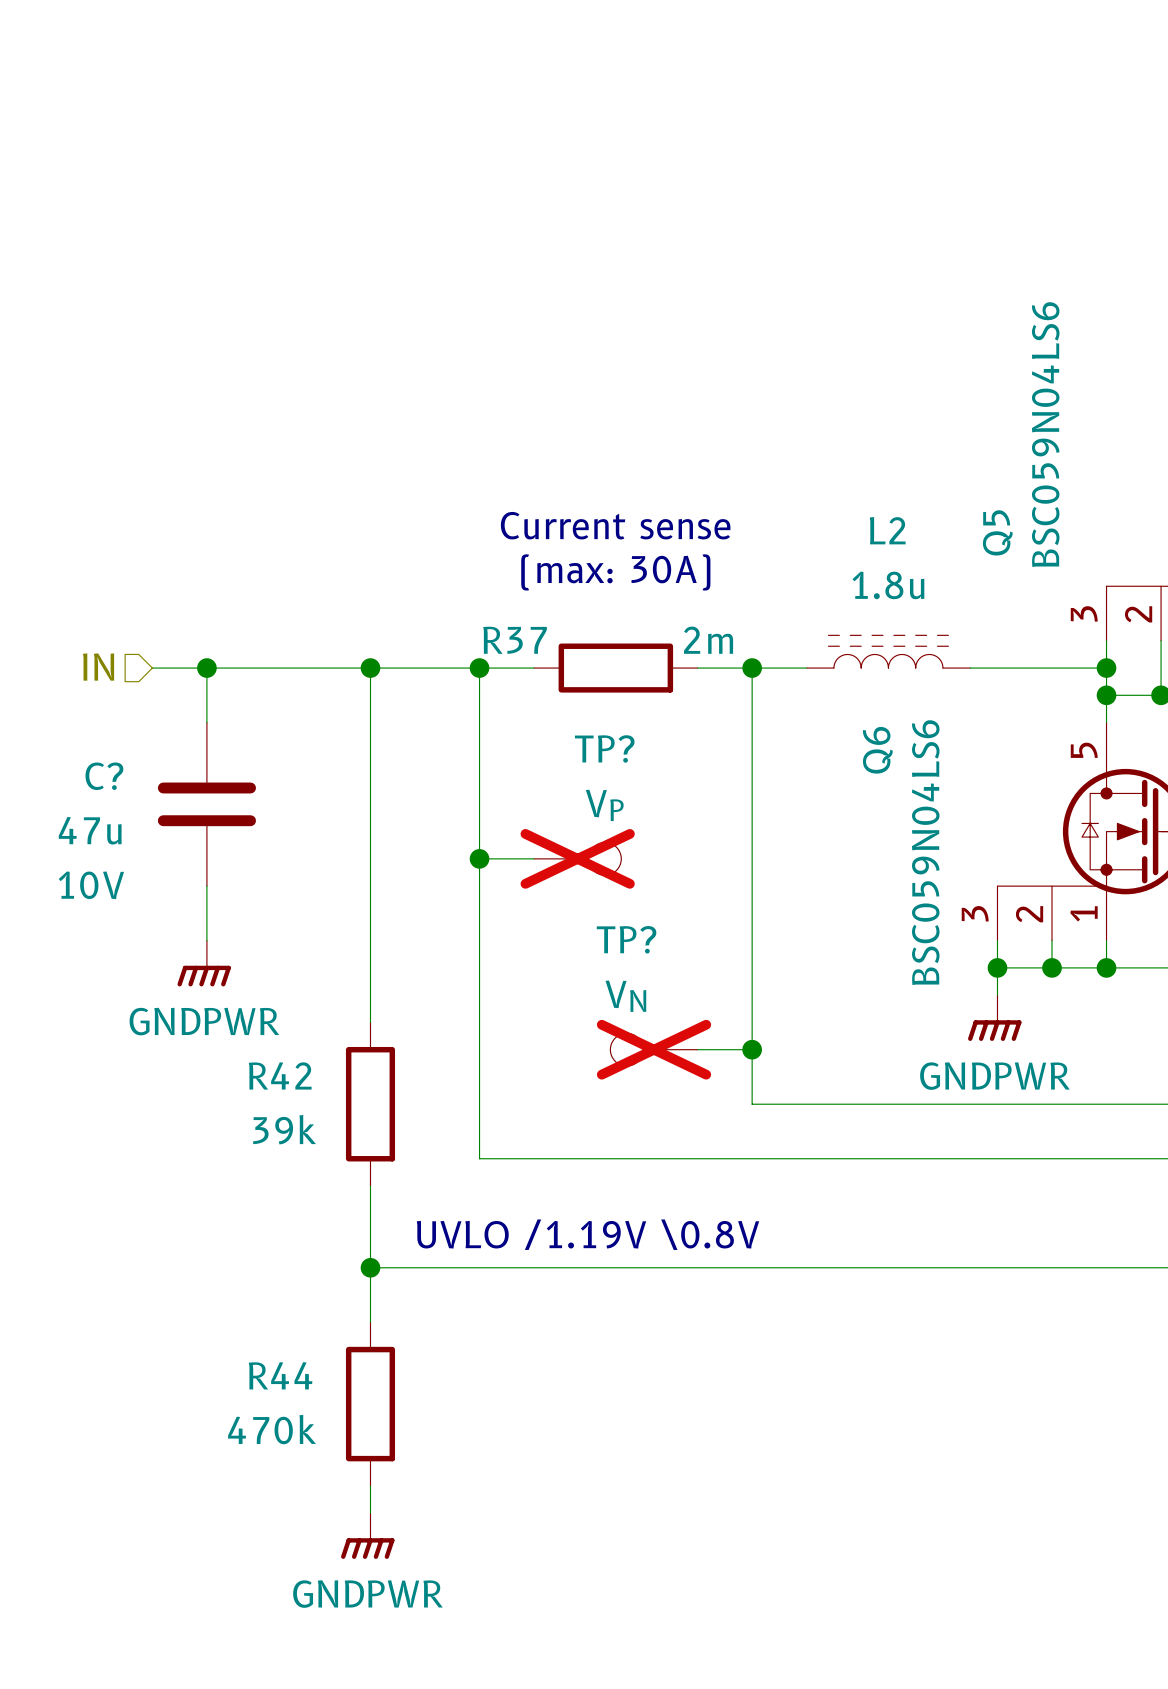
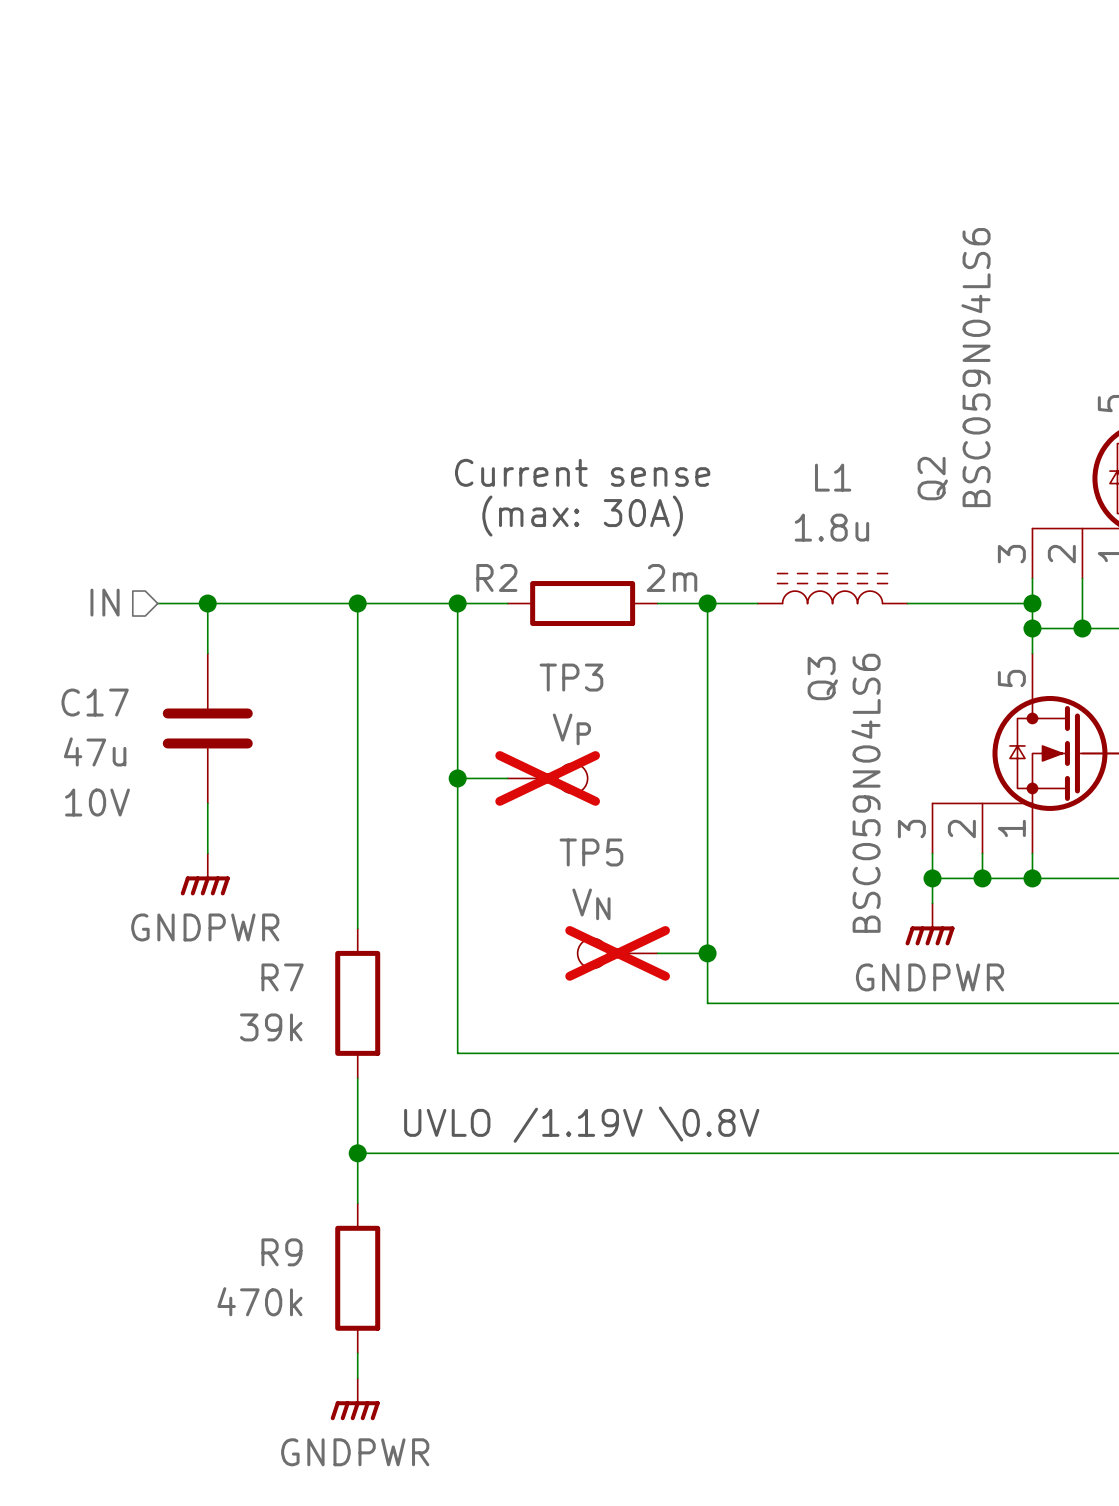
L2 name: L2 (887, 530) -> L1 (833, 477)
Q5 name: Q5 (997, 532) -> Q2 (932, 478)
R37 name: R37 (515, 640) -> R2 (496, 577)
TP? name: TP? (604, 748) -> TP3 (571, 677)
Q6 name: Q6 (877, 750) -> Q3 (822, 678)
C? name: C? (104, 776) -> C17 (95, 702)
TP? name: TP? (626, 939) -> TP5 (591, 852)
R42 name: R42 (280, 1075) -> R7 (282, 977)
R44 name: R44 (280, 1375) -> R9 (281, 1252)

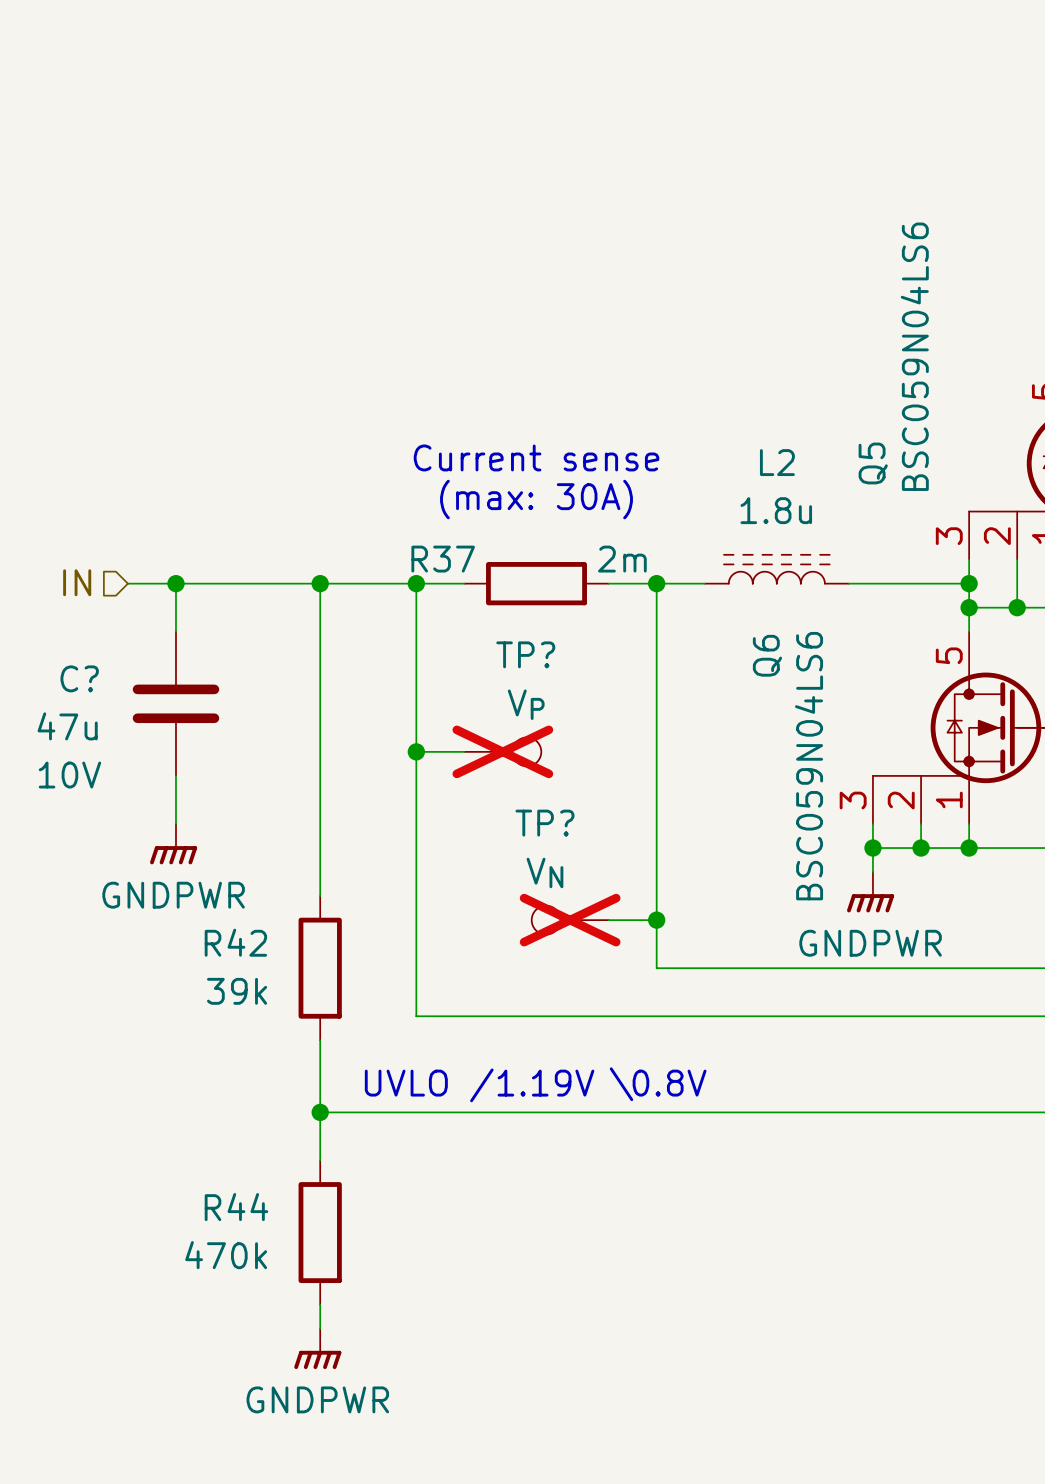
L1 name: L1 (833, 477) -> L2 (777, 462)
Q2 name: Q2 (932, 478) -> Q5 (873, 463)
R2 name: R2 (496, 577) -> R37 (443, 559)
TP3 name: TP3 (571, 677) -> TP? (525, 654)
Q3 name: Q3 (822, 678) -> Q6 (767, 655)
C17 name: C17 (95, 702) -> C? (79, 678)
TP5 name: TP5 (591, 852) -> TP? (544, 823)
R7 name: R7 (282, 977) -> R42 (235, 942)
R9 name: R9 (281, 1252) -> R44 (236, 1207)

